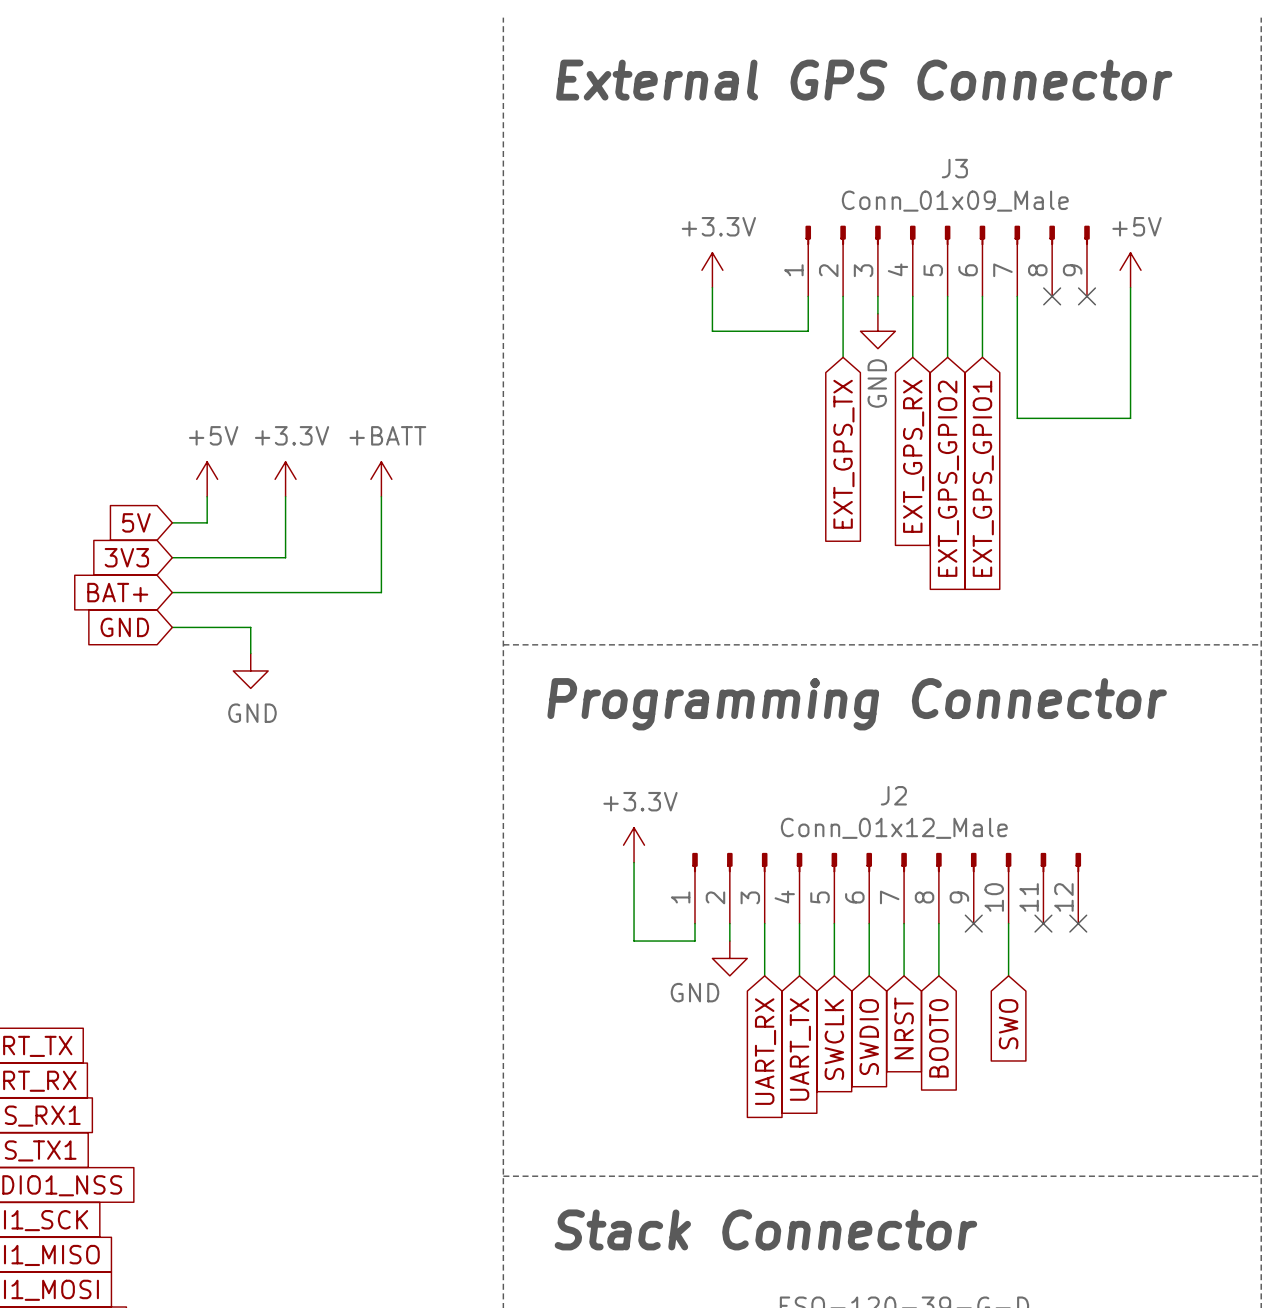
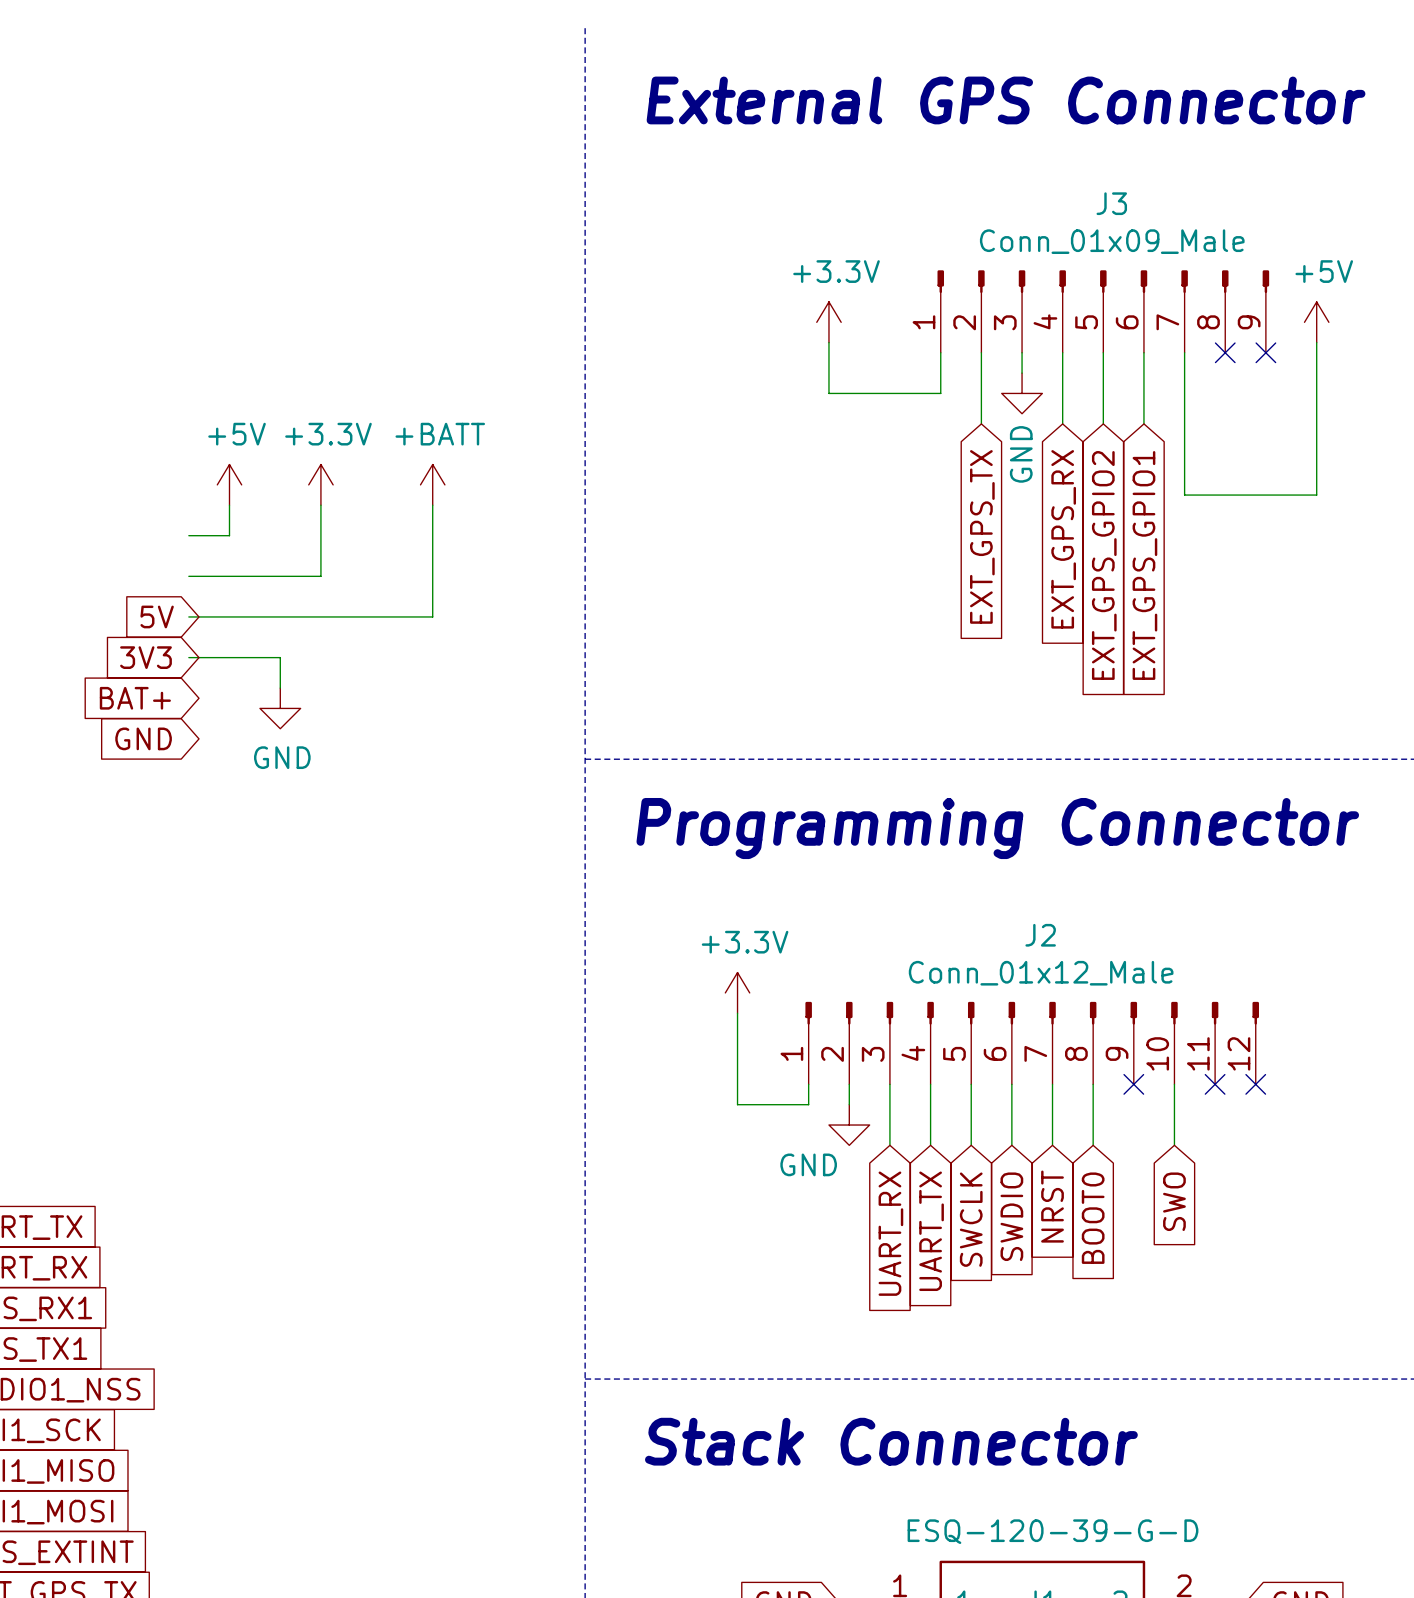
wire: none -> (229, 505) (229, 535) (188, 535)
wire: none -> (320, 505) (320, 576) (188, 576)
power symbol position: +5V (207, 479) -> +5V (229, 484)
power symbol position: +3.3V (285, 479) -> +3.3V (320, 484)
power symbol position: +BATT (381, 479) -> +BATT (432, 484)
wire: (207, 496) (207, 522) -> (432, 505) (432, 616) (239, 616)
wire: (285, 496) (285, 557) (242, 557) -> (280, 688) (280, 657)
wire: (381, 496) (381, 592) (172, 592) -> none
wire: none -> (188, 616) (199, 616)
wire: none -> (188, 657) (199, 657)
wire: (172, 627) (250, 627) (250, 653) -> none
power symbol position: GND (250, 670) -> GND (280, 708)

